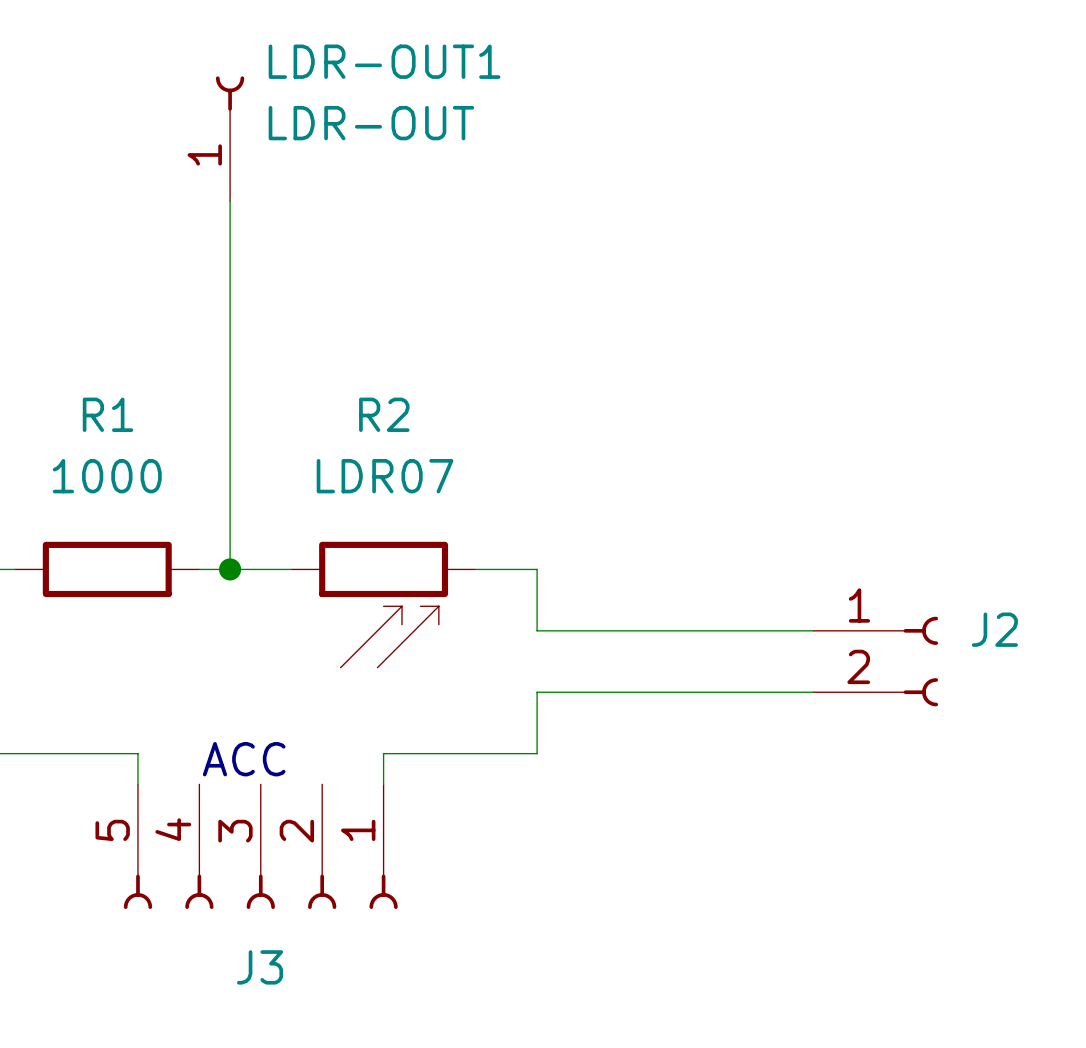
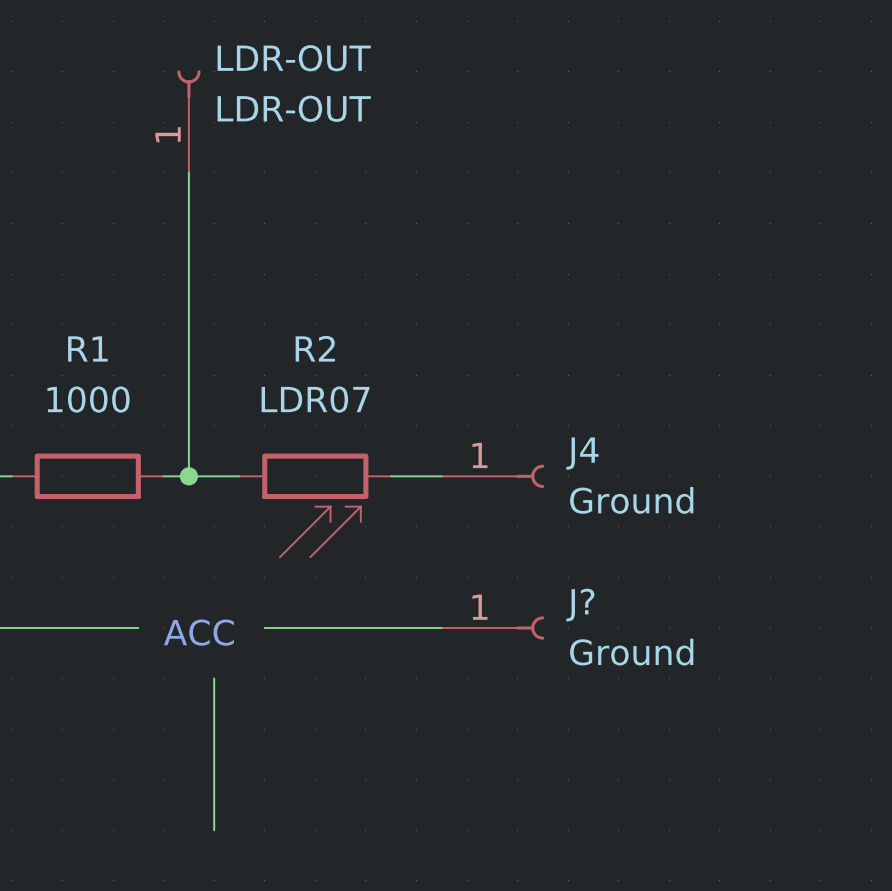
LDR-OUT1 name: LDR-OUT1 (384, 61) -> LDR-OUT (294, 58)
wire: (537, 569) (537, 630) (813, 630) -> none
J4: none -> Ground (493, 476)
J2: (875, 661) -> none
wire: (813, 692) (537, 692) (537, 753) -> none
wire: (137, 753) (137, 784) -> (113, 628) (138, 628)
wire: (383, 753) (383, 784) -> (315, 628) (264, 628)
J?: none -> Ground (493, 628)
wire: none -> (214, 678) (214, 830)
J3: (260, 846) -> none

